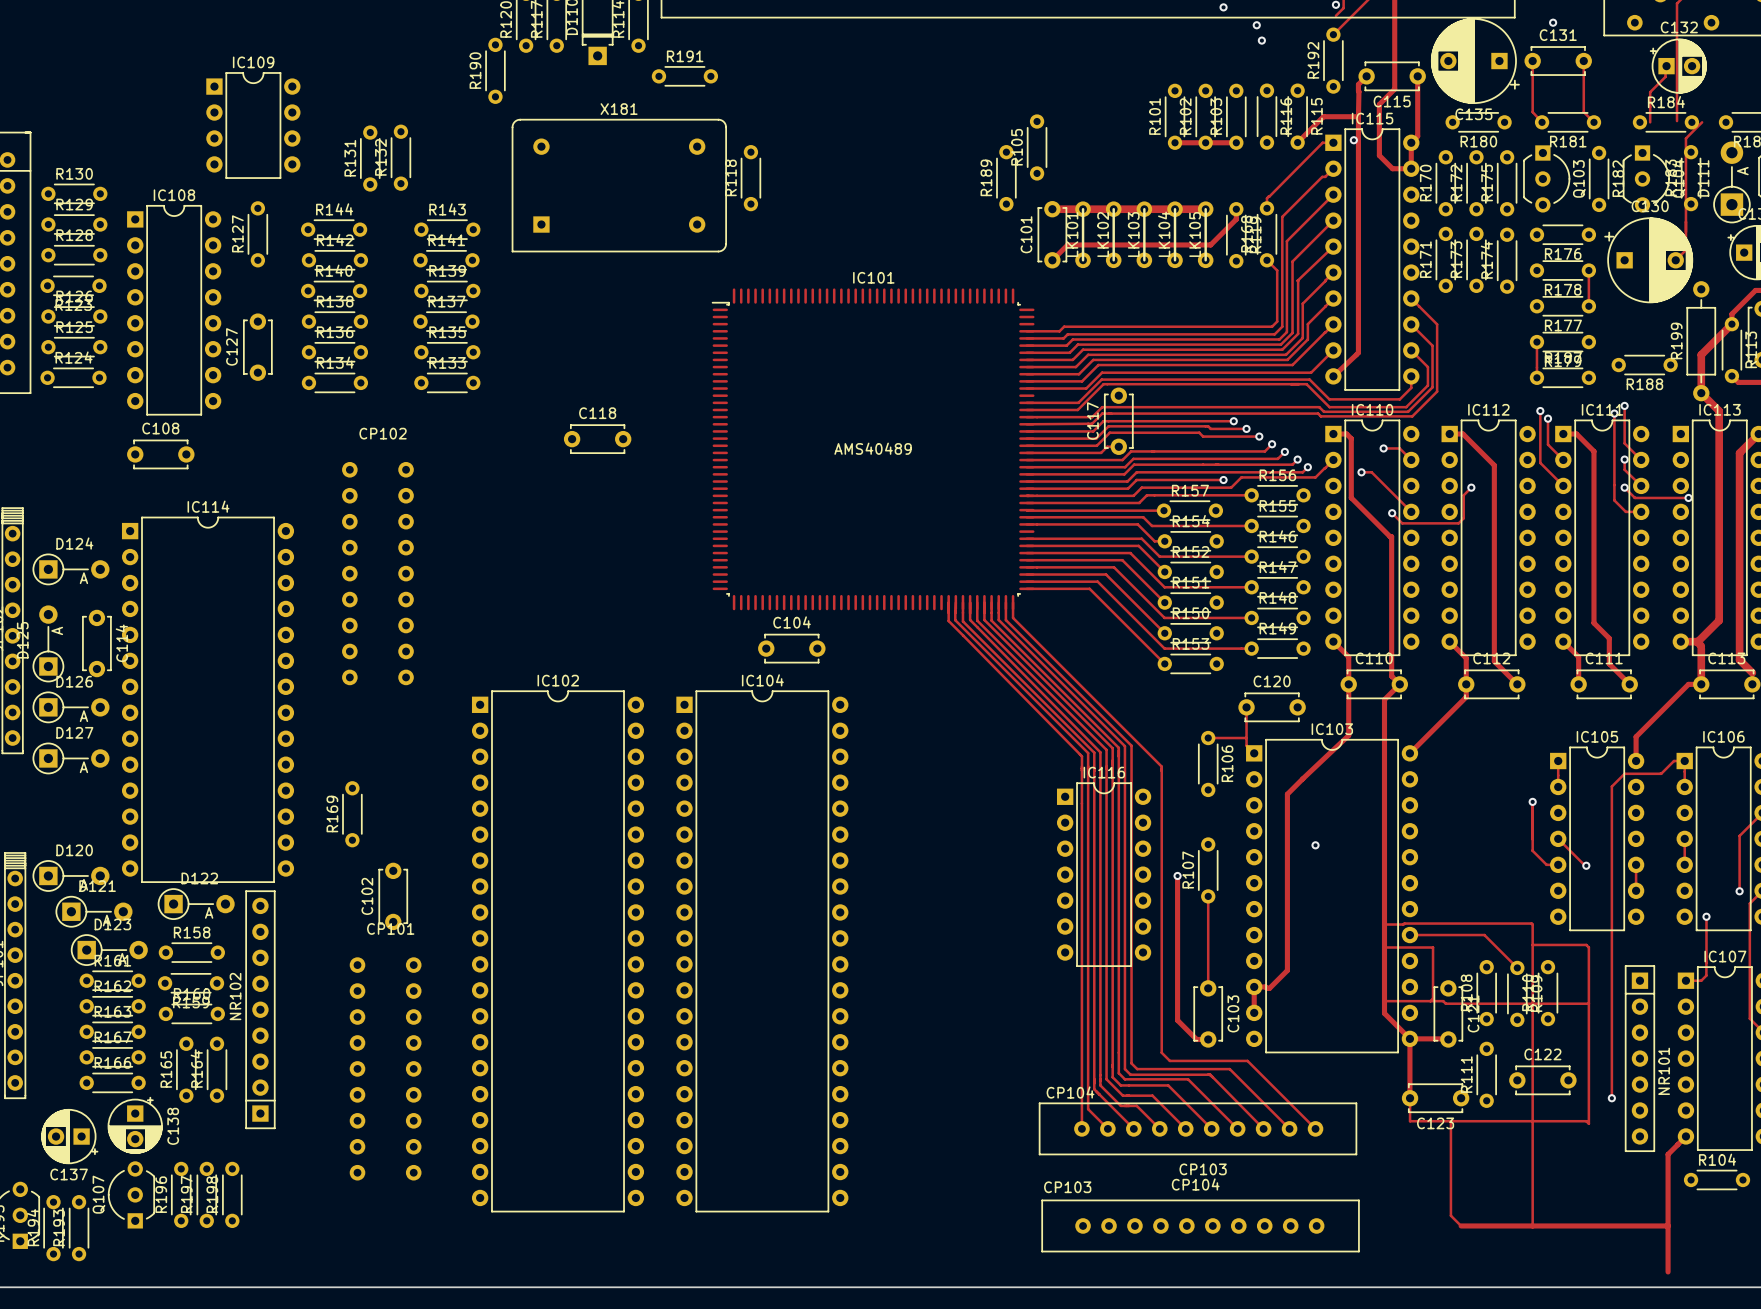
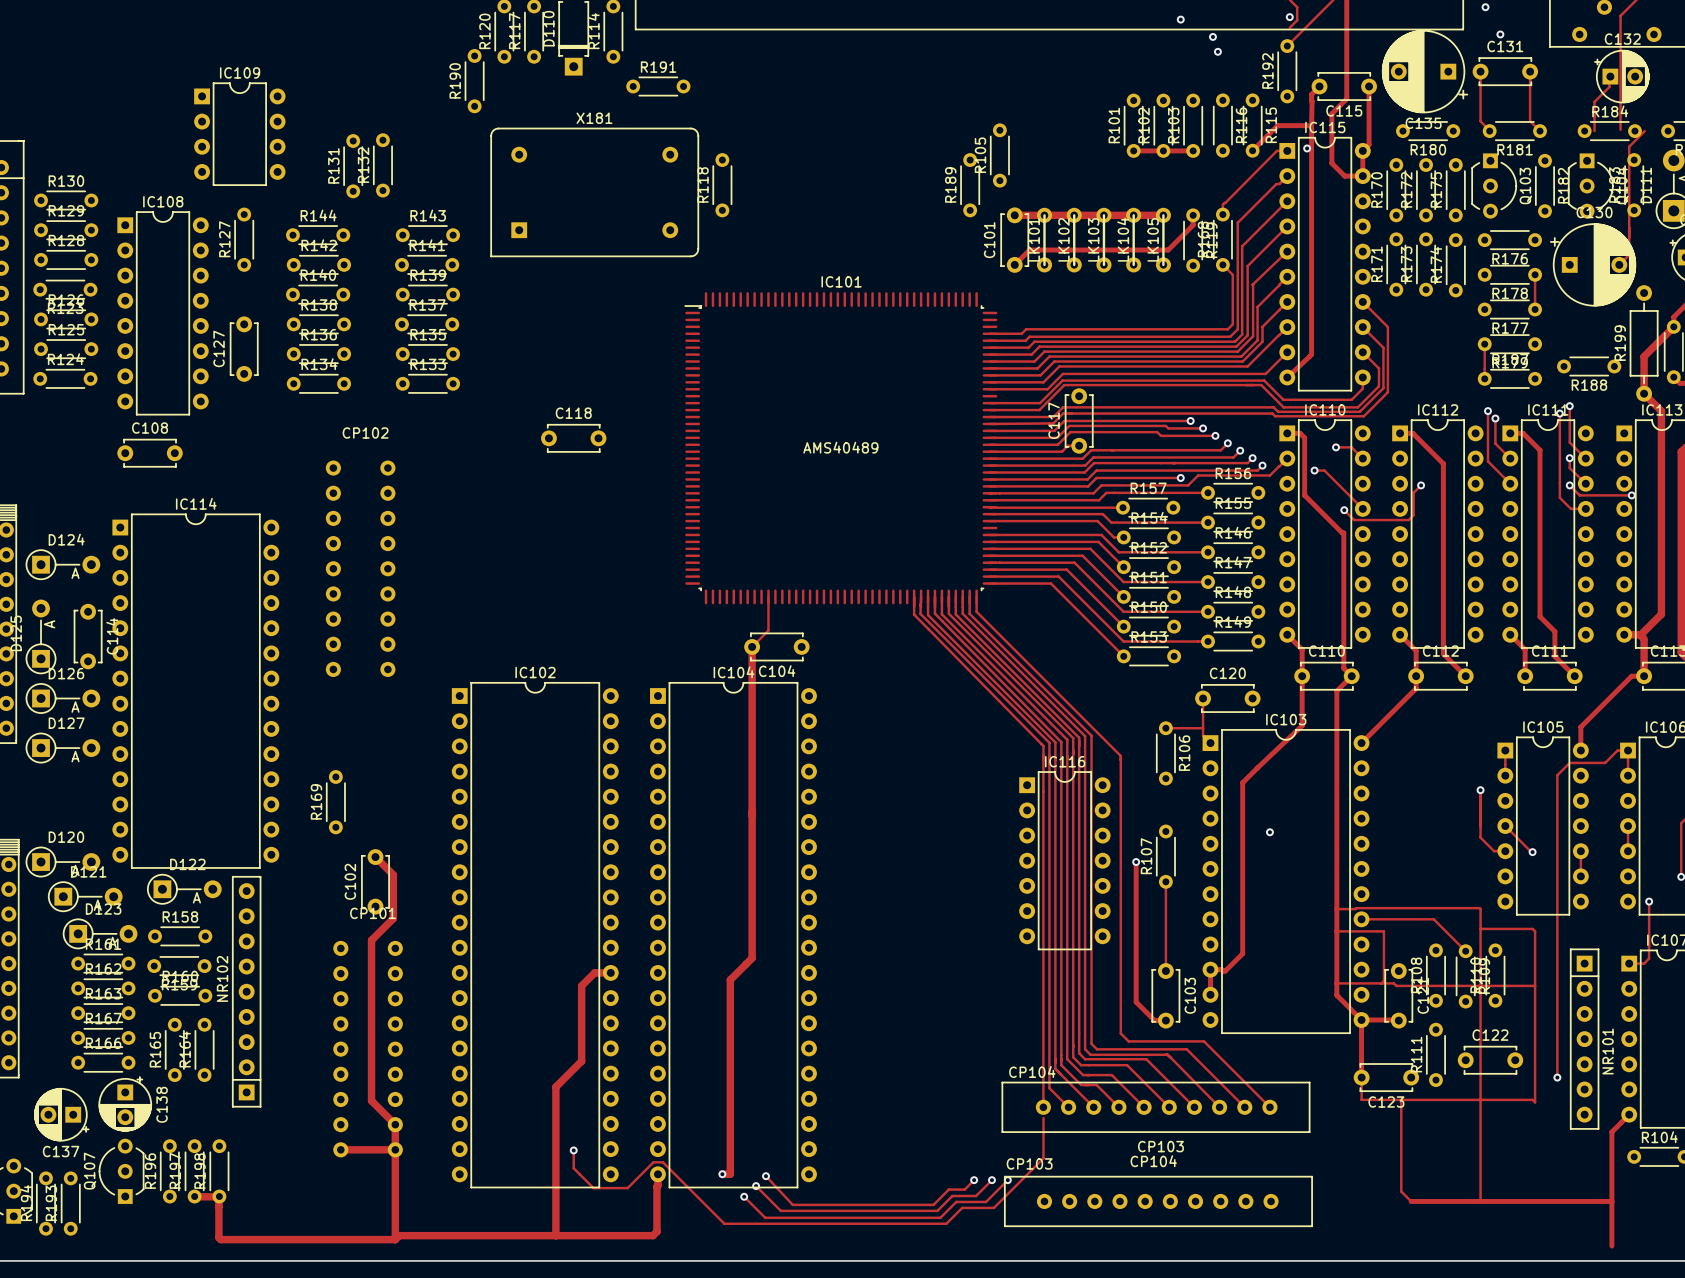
track: none -> (768, 596) (768, 630) (752, 646) (752, 958) (730, 979) (730, 1174) (722, 1174)
C104 name position: C104 (792, 622) -> C104 (777, 671)
C104 position: (791, 648) -> (776, 646)
track: none -> (375, 857) (393, 874) (393, 918) (371, 940) (371, 1100) (395, 1124) (395, 1239)
track: none -> (610, 972) (594, 972) (581, 985) (581, 1061) (555, 1086) (555, 1235)
track: none -> (1043, 1118) (1043, 1158) (993, 1207) (962, 1207) (946, 1223) (724, 1223) (662, 1162) (653, 1162) (627, 1188) (593, 1188) (573, 1168) (573, 1150)
track: none -> (340, 1149) (395, 1149)
via: none -> (573, 1150)
track: none -> (657, 1174) (656, 1231) (653, 1235) (399, 1235) (395, 1239)
via: none -> (722, 1174)
track: none -> (765, 1176) (792, 1204) (933, 1204) (948, 1189) (964, 1189) (974, 1180)
via: none -> (765, 1176)
via: none -> (974, 1180)
track: none -> (991, 1180) (976, 1196) (952, 1196) (937, 1210) (780, 1210) (756, 1186)
via: none -> (991, 1180)
track: none -> (1007, 1180) (986, 1201) (956, 1201) (940, 1217) (765, 1217) (744, 1196)
via: none -> (1007, 1180)
via: none -> (756, 1186)
track: none -> (195, 1196) (218, 1196) (218, 1237) (220, 1239) (395, 1239)
via: none -> (744, 1196)

